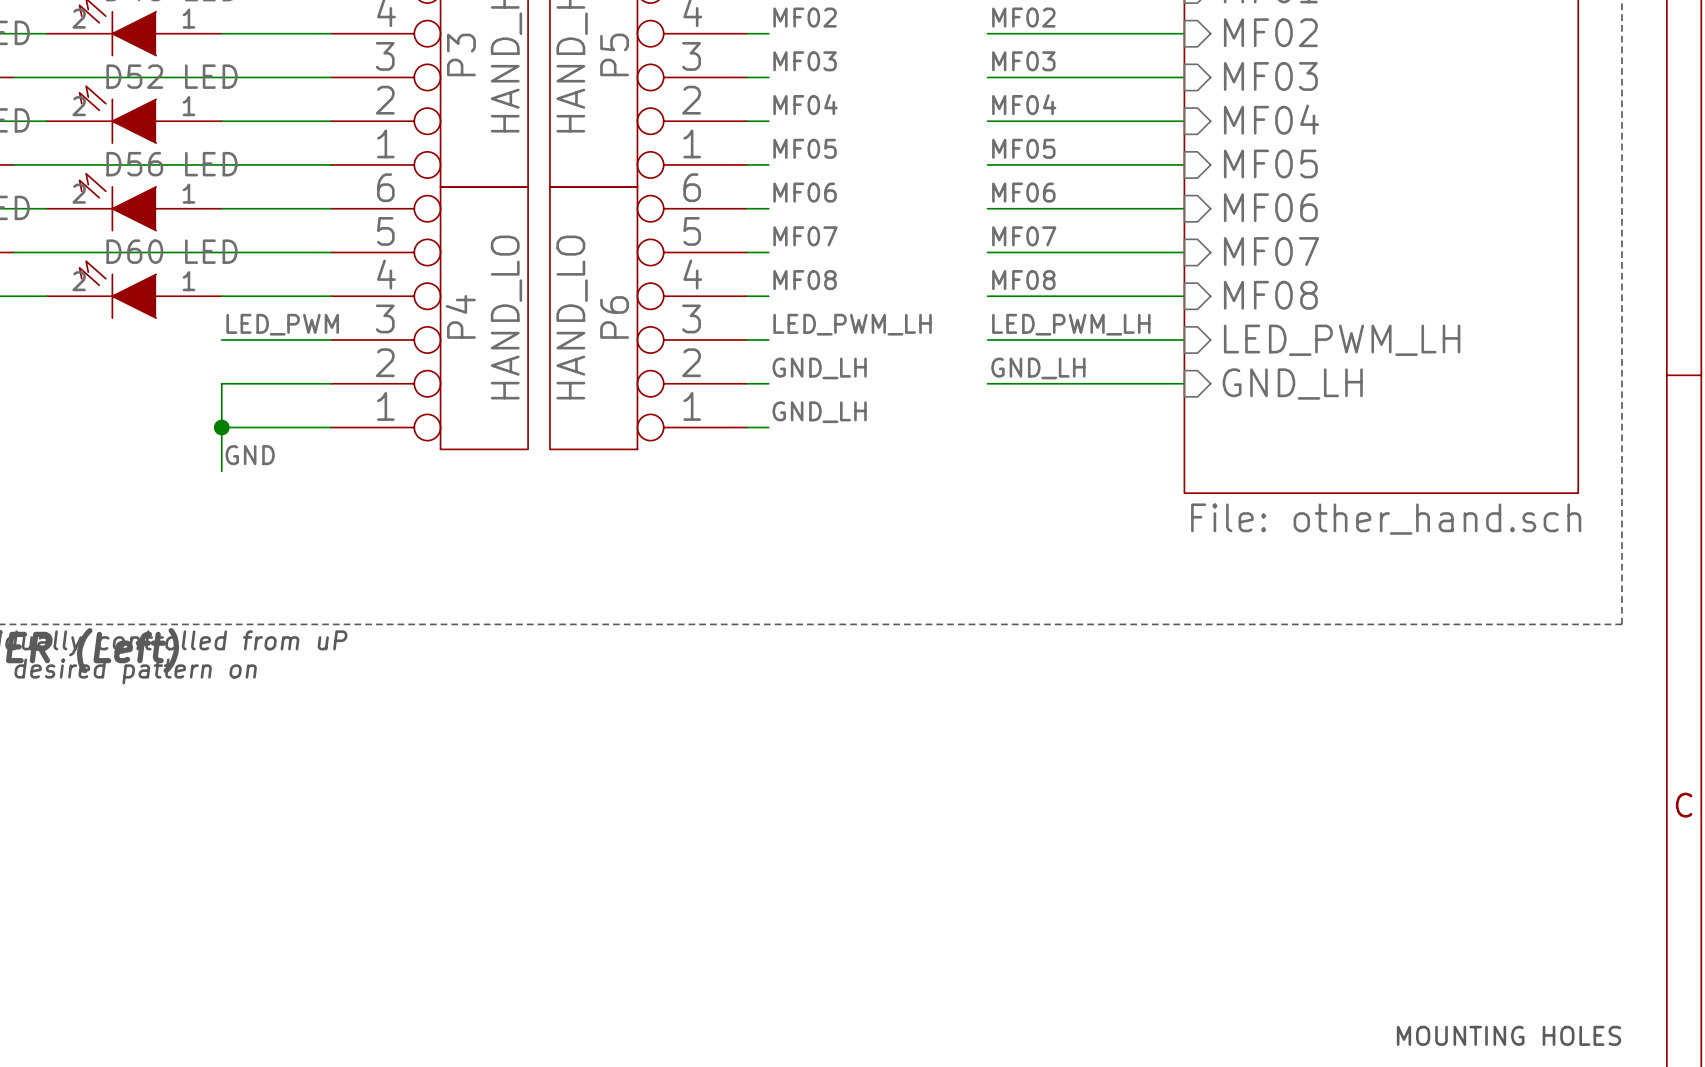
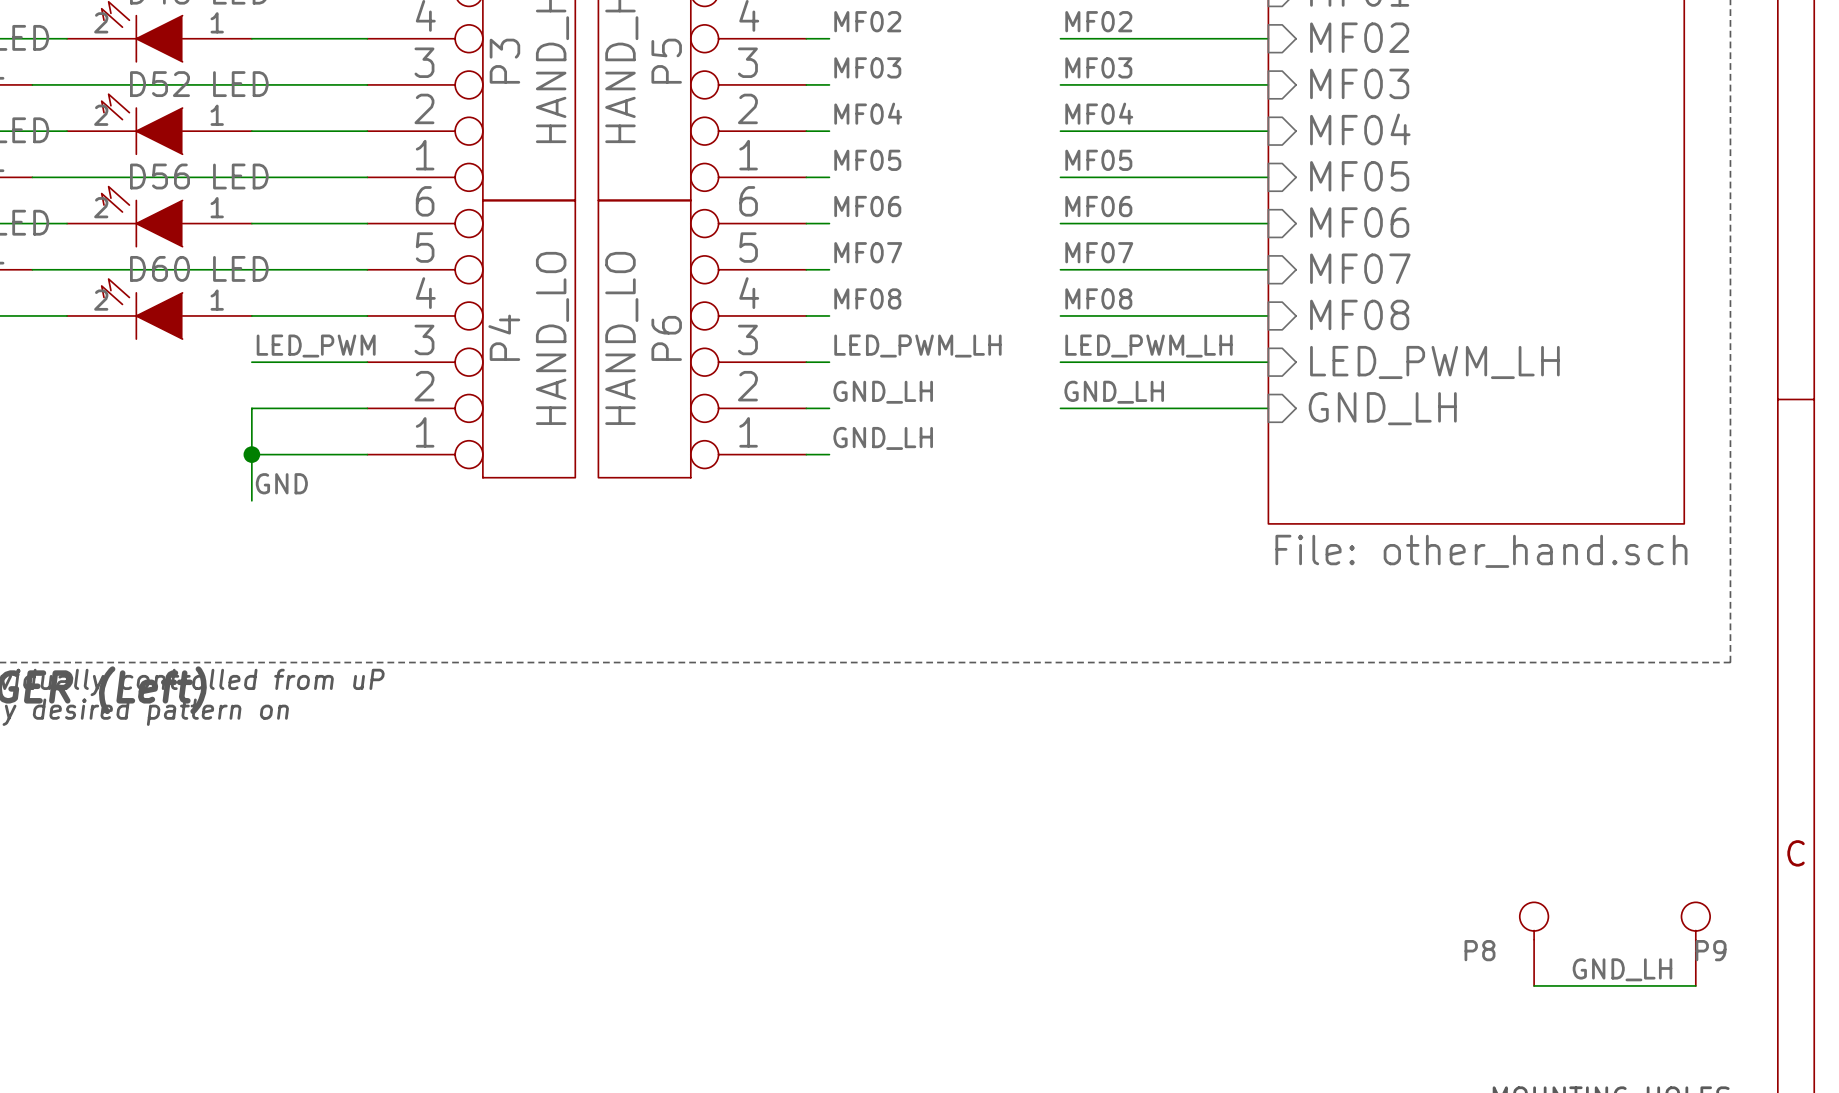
P8: none -> (1534, 944)
P9: none -> (1695, 944)
label: none -> GND_LH (1622, 969)
wire: none -> (1534, 985) (1695, 985)

